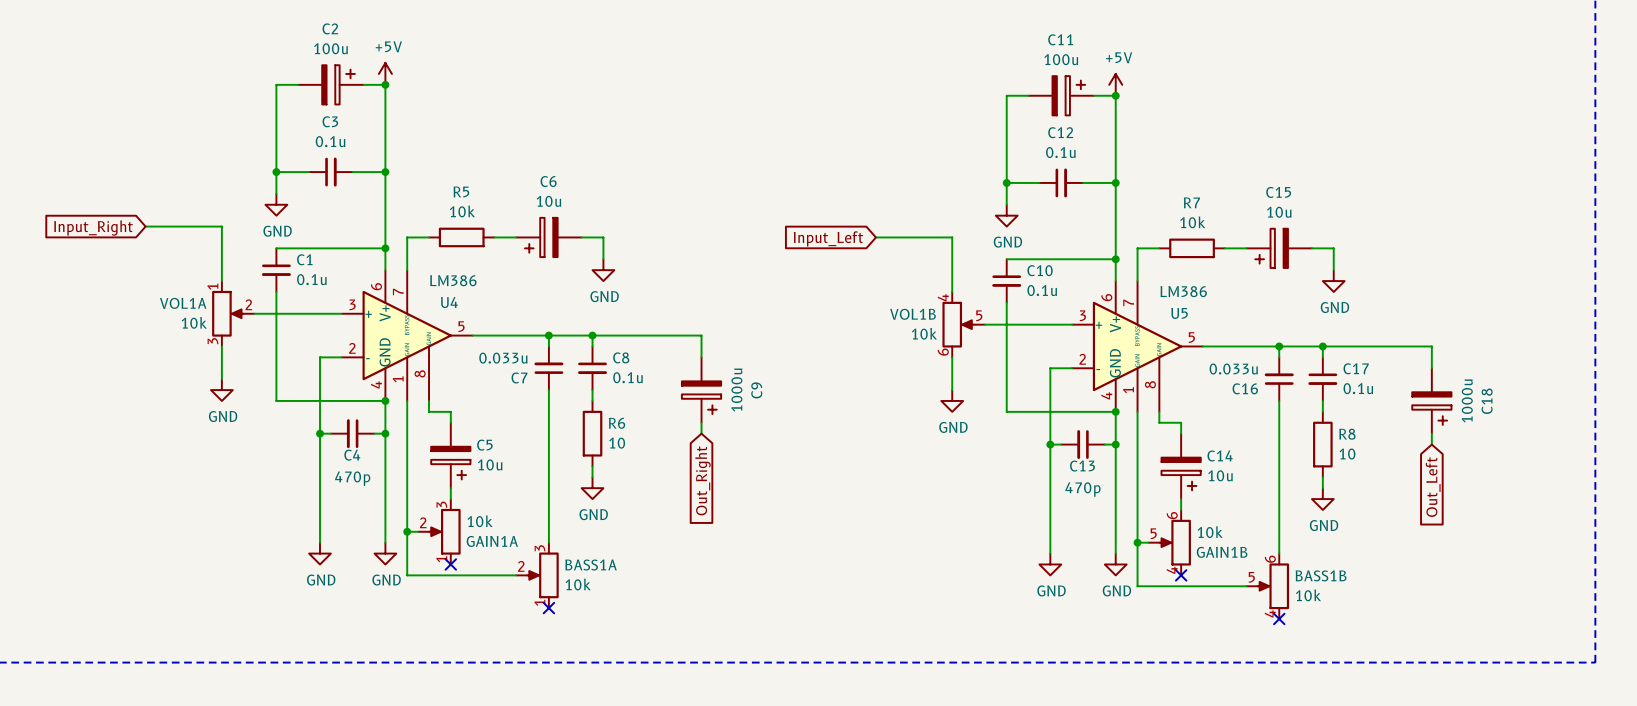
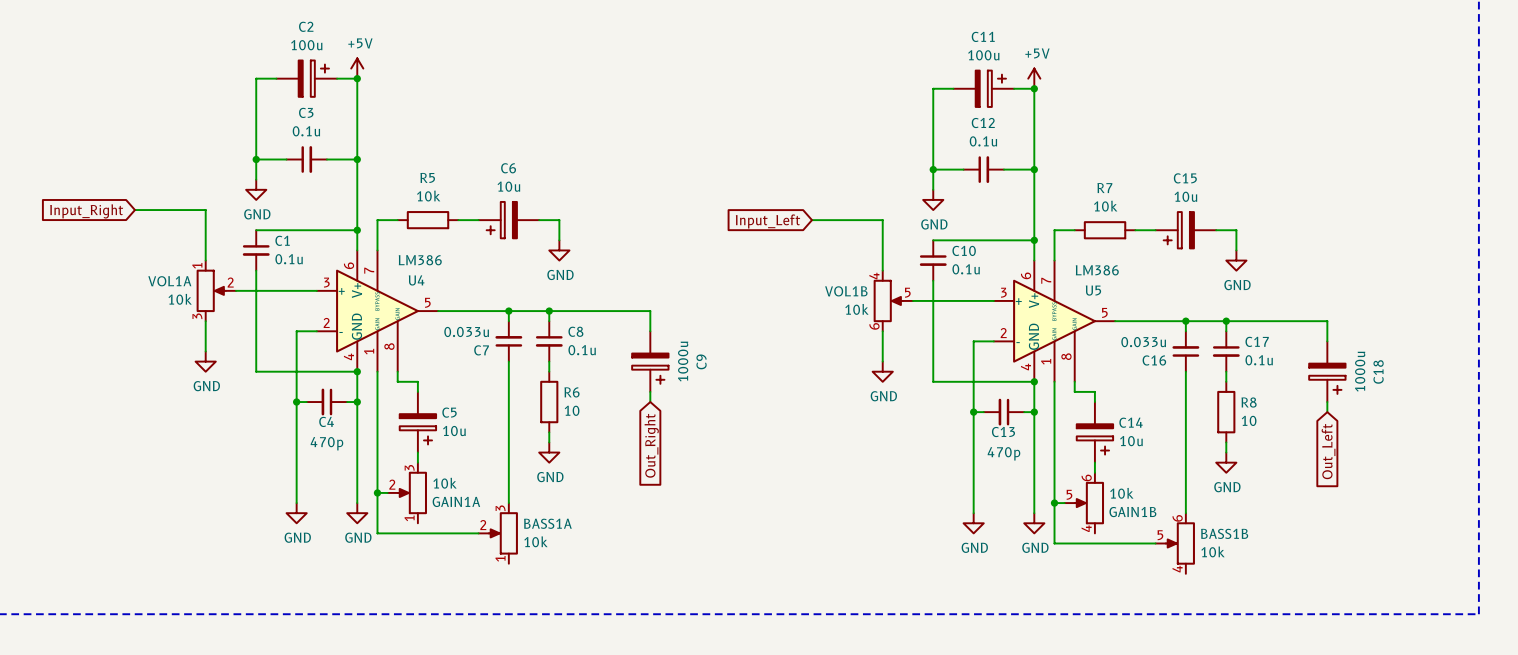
no-connect mark: (450, 564) -> none
no-connect mark: (1181, 575) -> none
no-connect mark: (548, 608) -> none
no-connect mark: (1279, 618) -> none

